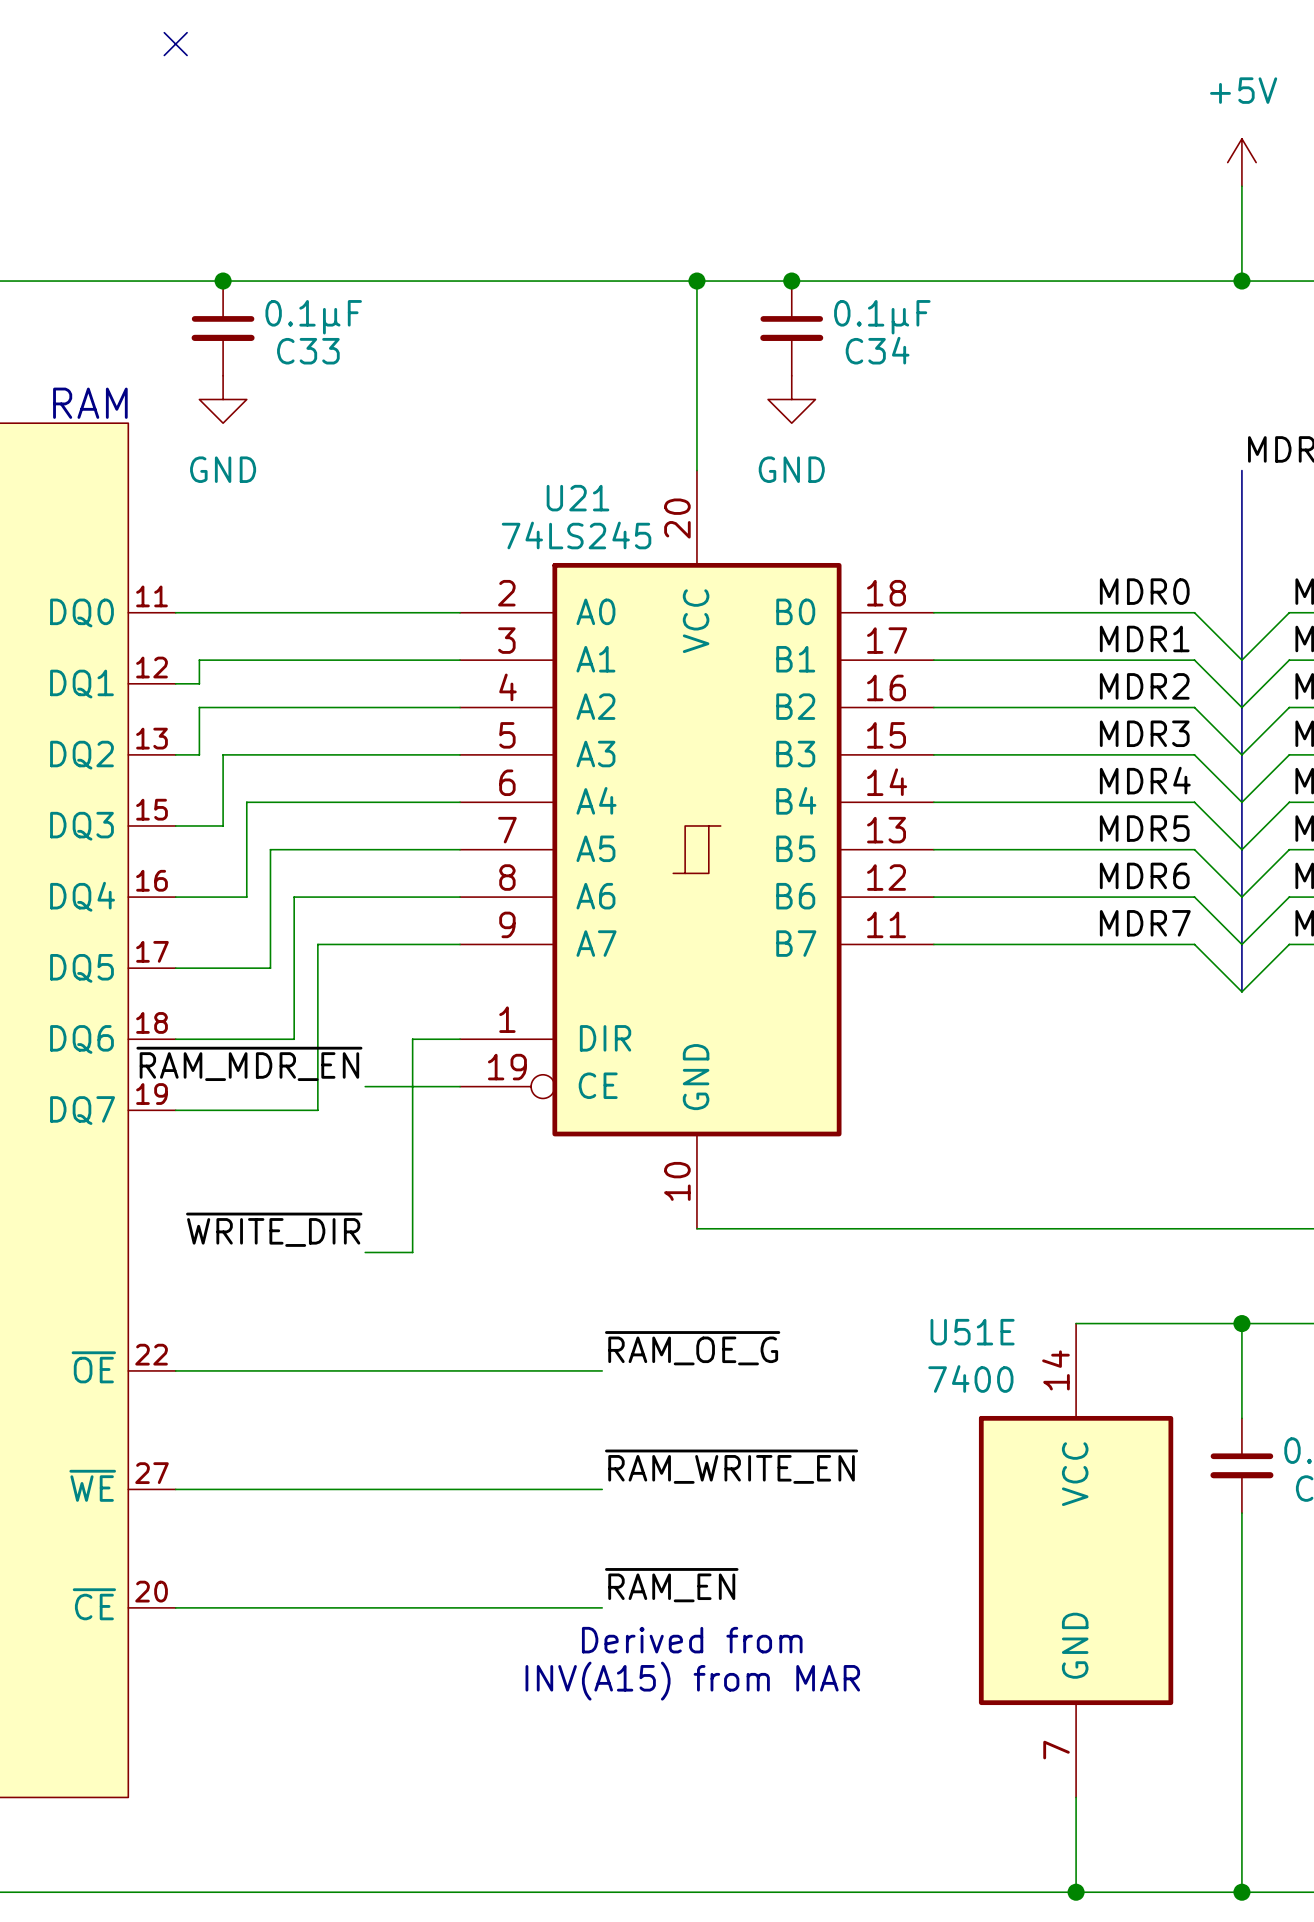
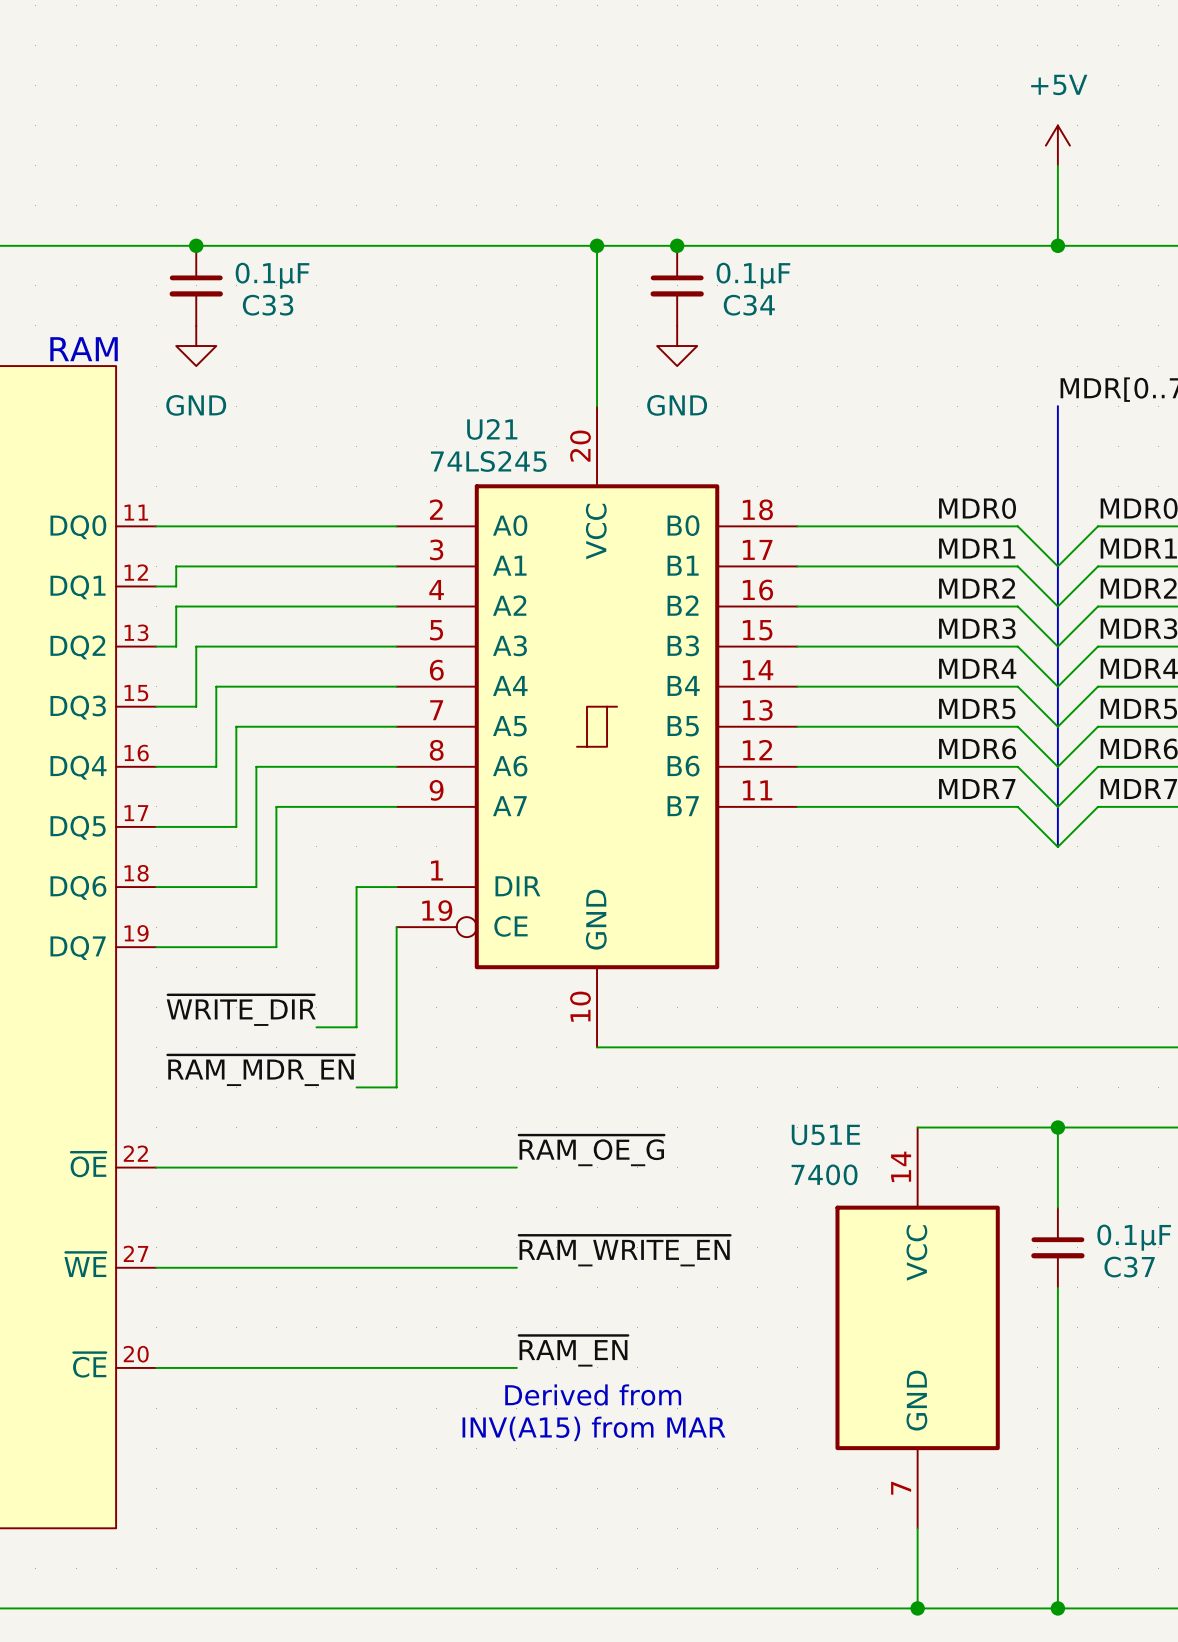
no-connect mark: (175, 44) -> none
label position: ~{RAM_MDR_EN} (249, 1063) -> ~{RAM_MDR_EN} (261, 1070)
wire: (365, 1086) (460, 1086) -> (356, 1087) (396, 1087) (396, 927)
wire: (412, 1205) (412, 1252) (365, 1252) -> (356, 1027) (316, 1027)
label position: ~{WRITE_DIR} (274, 1229) -> ~{WRITE_DIR} (241, 1010)

